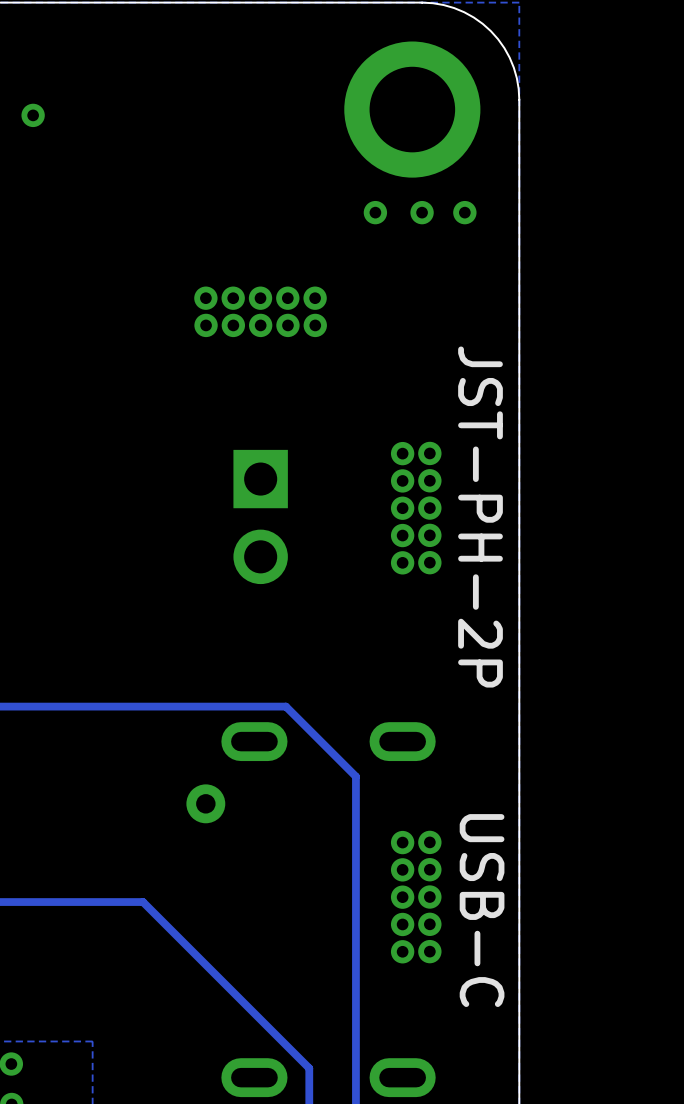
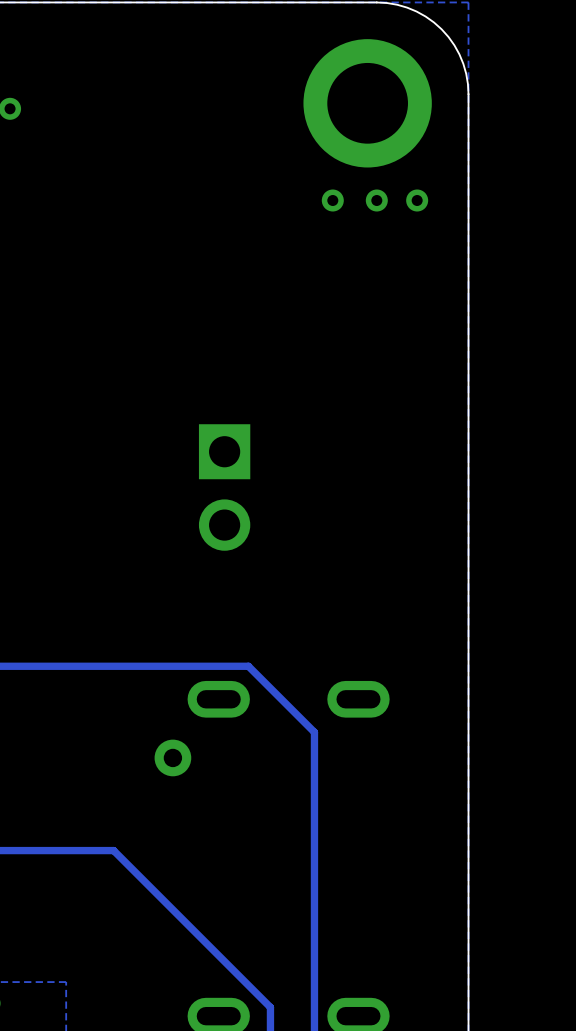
via: (205, 298) -> none
via: (233, 298) -> none
via: (260, 298) -> none
via: (287, 298) -> none
via: (315, 298) -> none
via: (206, 325) -> none
via: (233, 325) -> none
via: (260, 325) -> none
via: (287, 325) -> none
via: (315, 325) -> none
via: (402, 453) -> none
via: (429, 453) -> none
via: (402, 480) -> none
via: (429, 480) -> none
via: (402, 508) -> none
via: (429, 508) -> none
text: JST-PH-2P (480, 517) -> none
via: (402, 535) -> none
via: (429, 535) -> none
via: (402, 562) -> none
via: (429, 562) -> none
via: (402, 842) -> none
via: (429, 842) -> none
via: (402, 869) -> none
via: (429, 869) -> none
via: (402, 897) -> none
via: (429, 897) -> none
text: USB-C (482, 910) -> none
via: (402, 924) -> none
via: (429, 924) -> none
via: (402, 951) -> none
via: (429, 951) -> none

